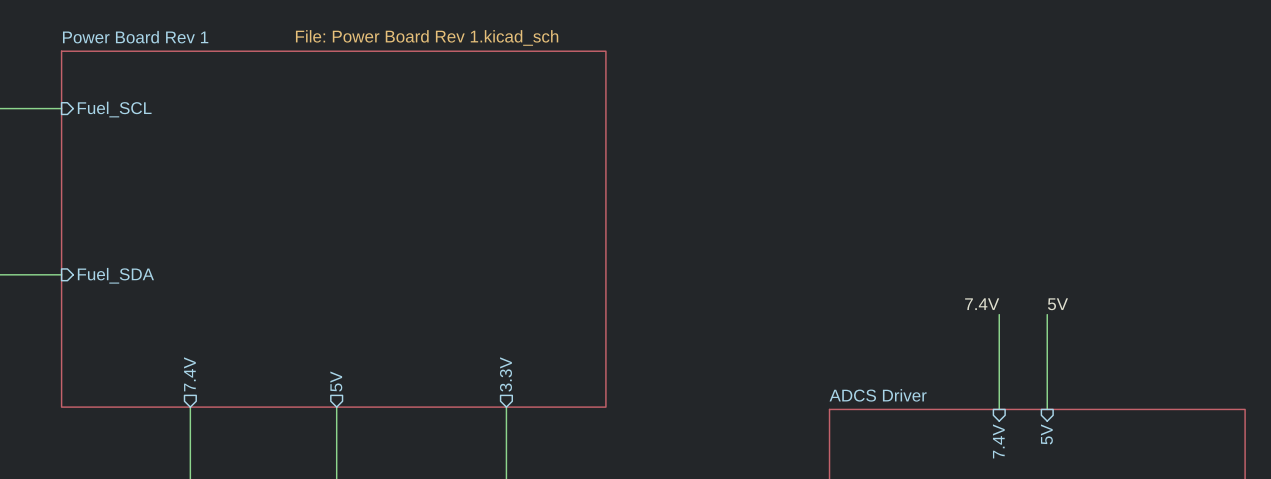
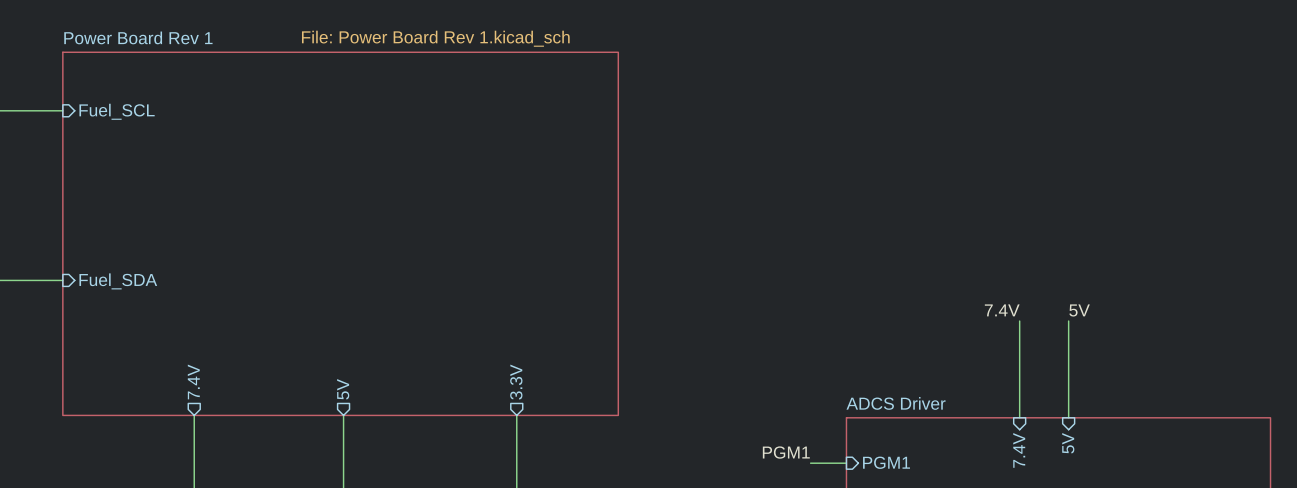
label: none -> PGM1 (786, 452)
wire: none -> (810, 463) (846, 463)
sheet pin: none -> PGM1 (886, 462)

